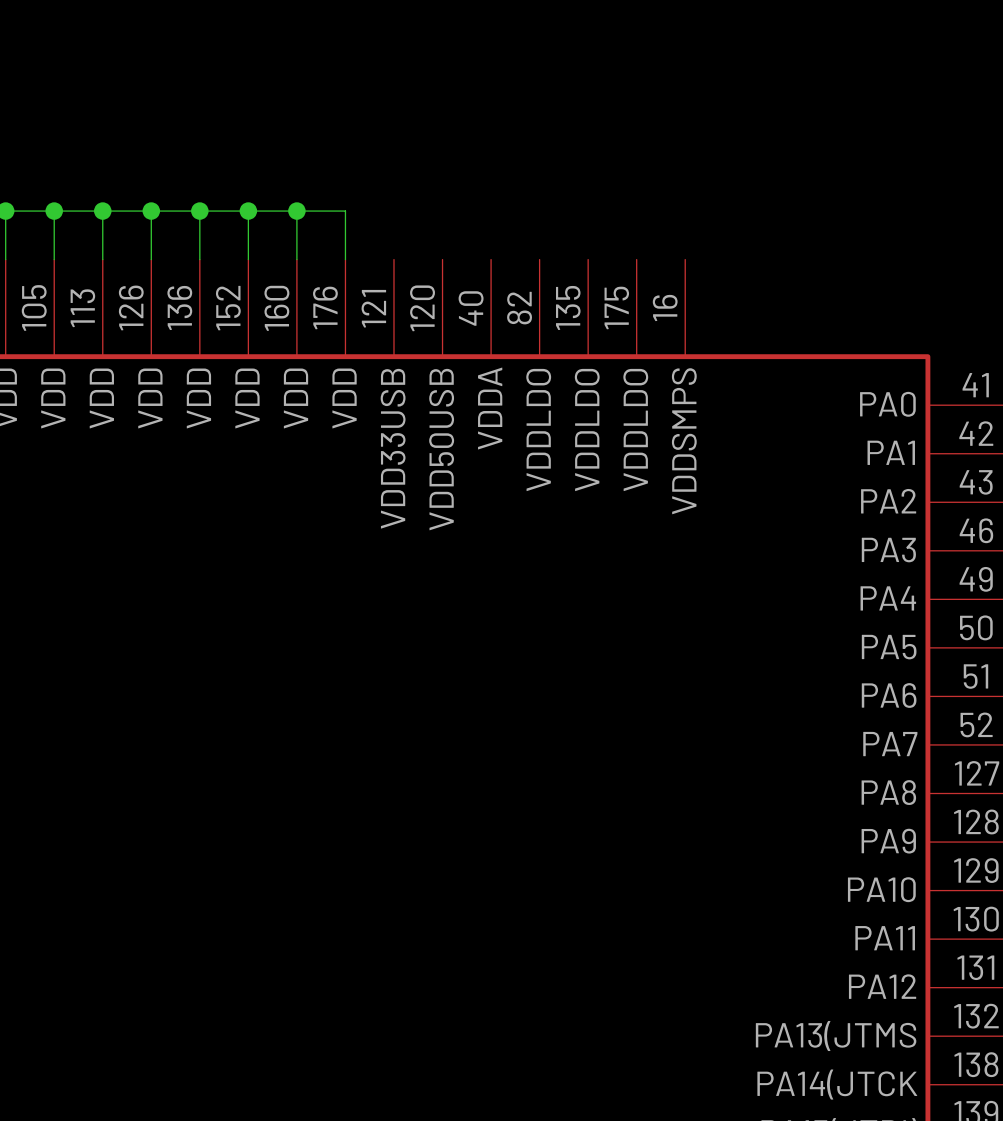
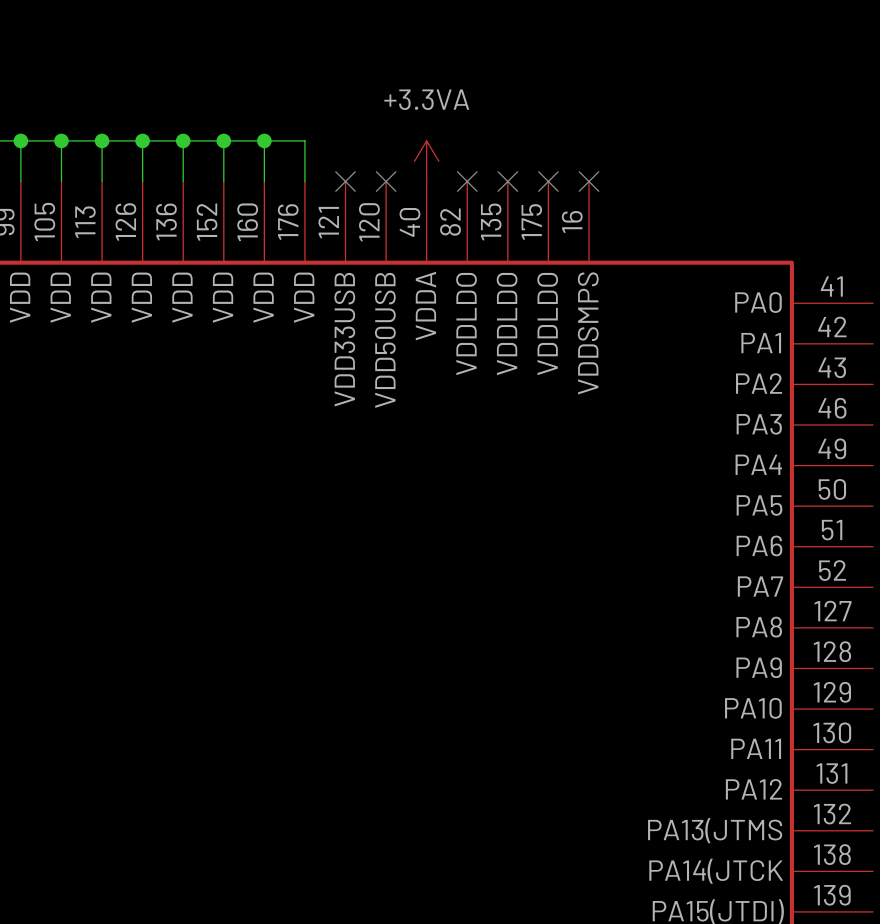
power symbol: none -> +3.3VA (426, 161)
no-connect mark: none -> (345, 181)
no-connect mark: none -> (386, 181)
no-connect mark: none -> (467, 181)
no-connect mark: none -> (507, 181)
no-connect mark: none -> (548, 181)
no-connect mark: none -> (589, 181)

